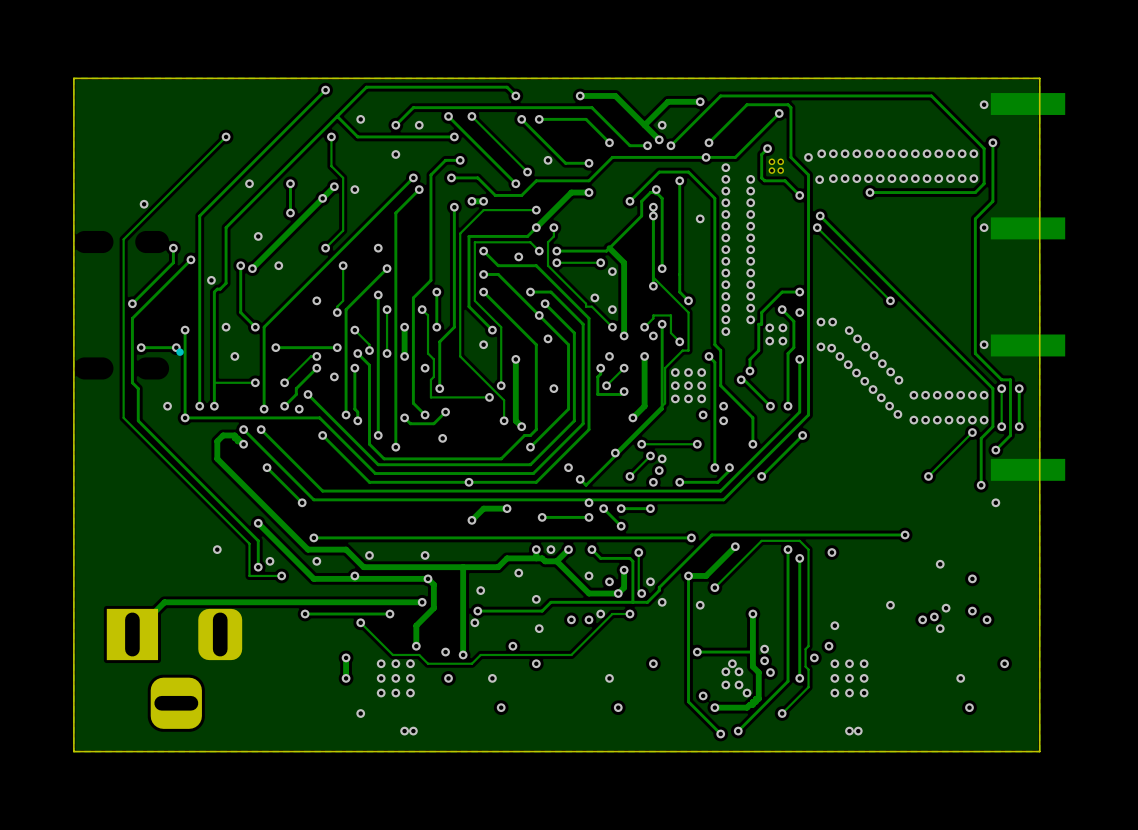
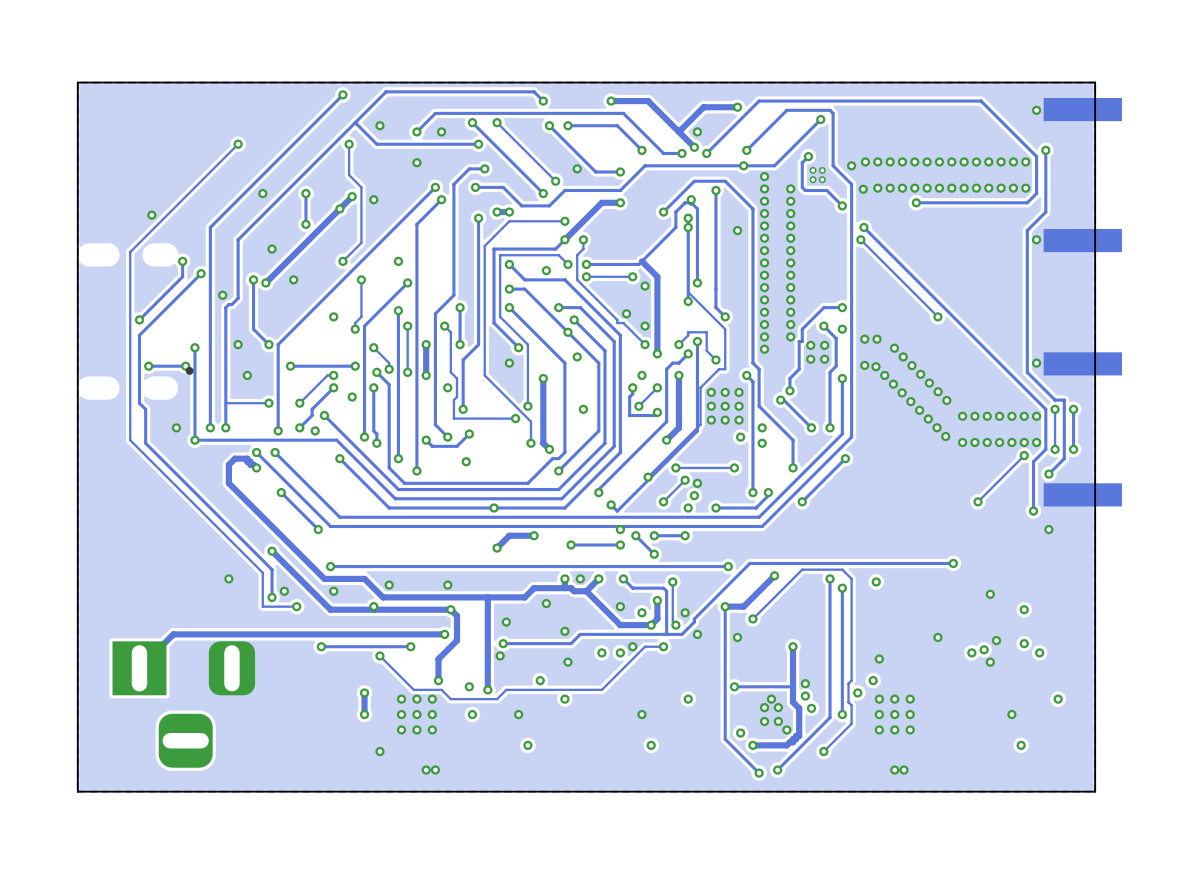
track: none -> (688, 353) (678, 363) (672, 363) (666, 369) (666, 421) (598, 489) (598, 492)

